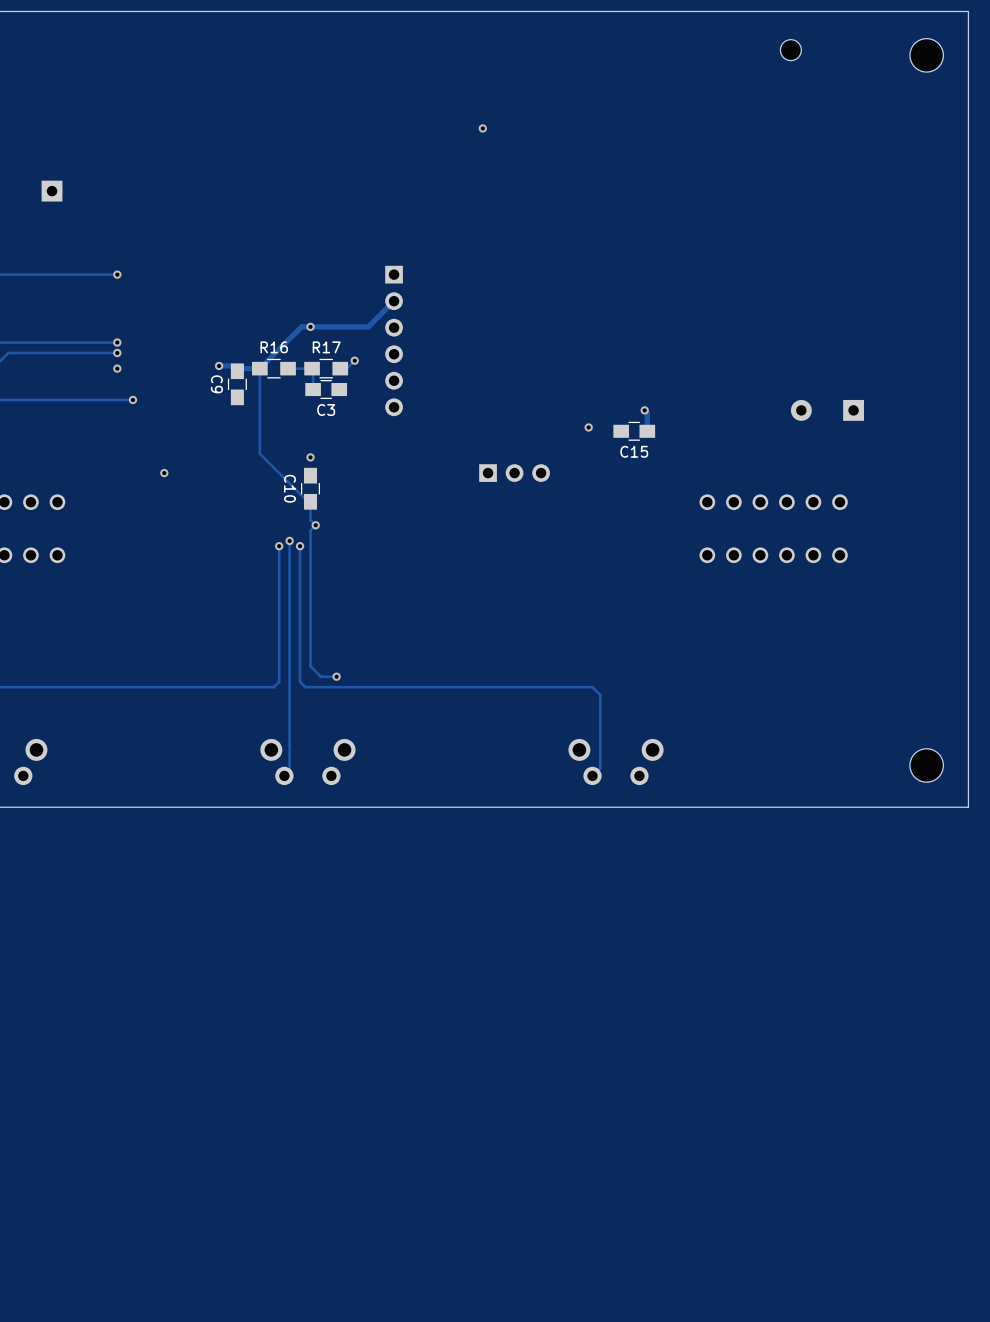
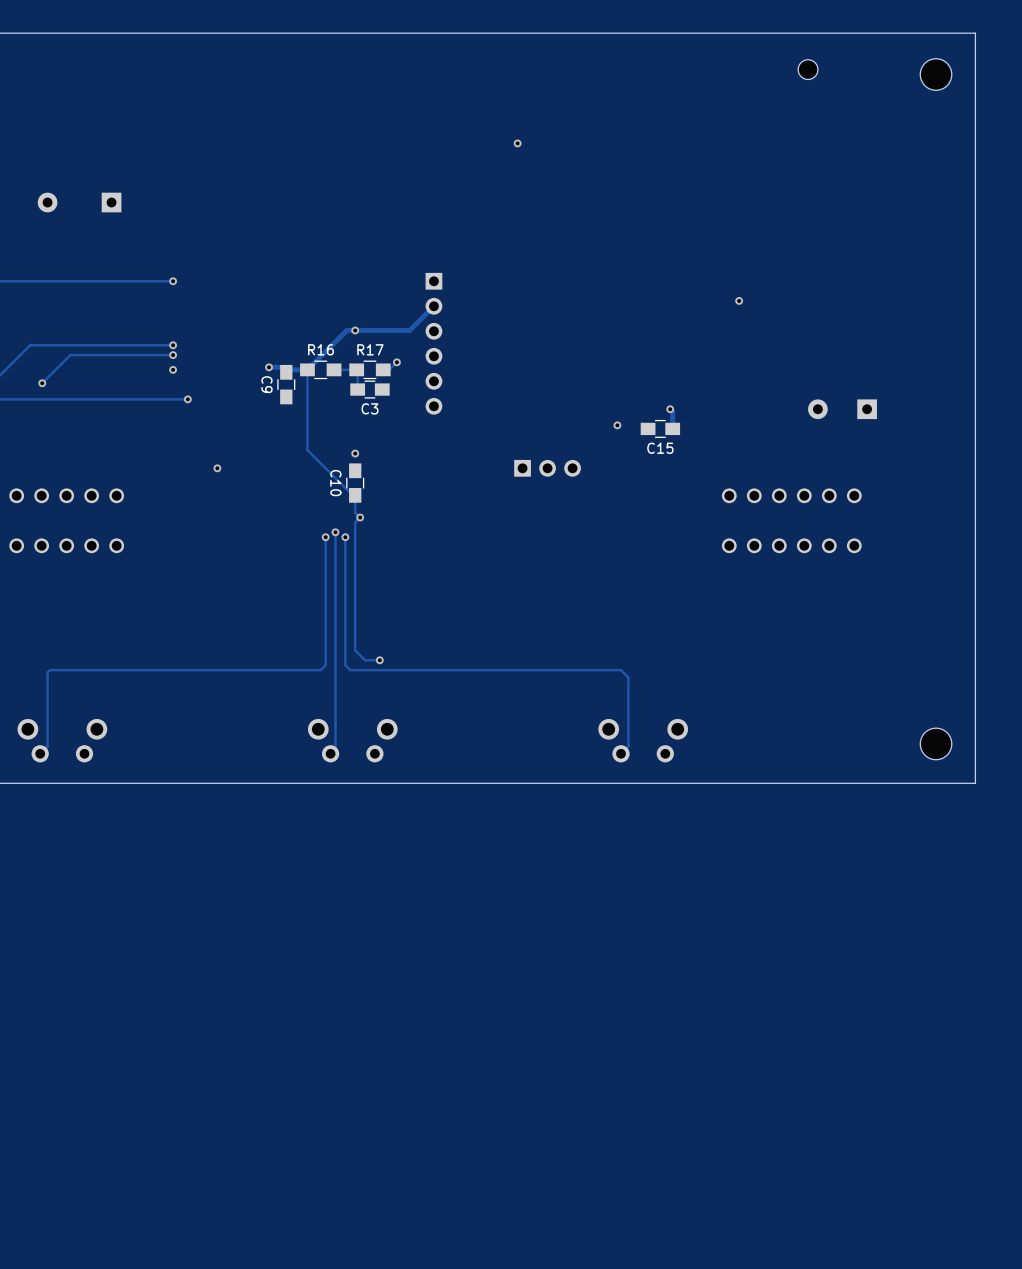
via: none -> (739, 300)

